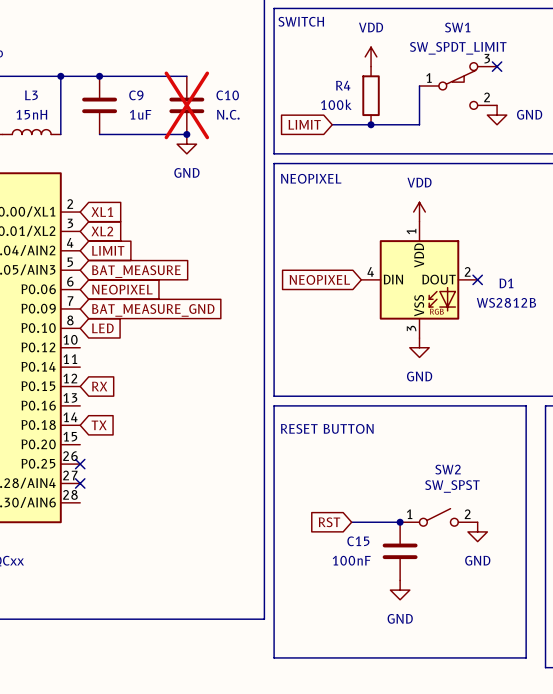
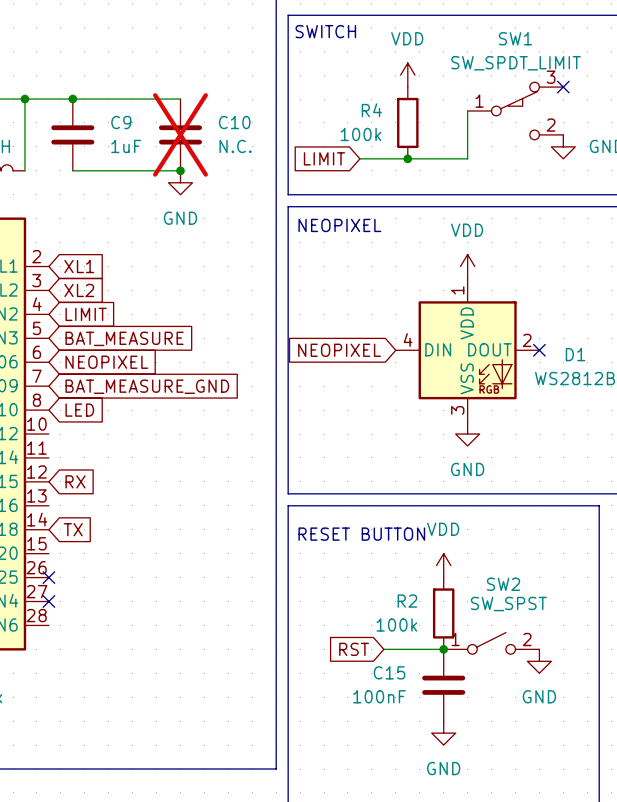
power symbol: none -> VDD (443, 565)
R2: none -> 100k (443, 613)

